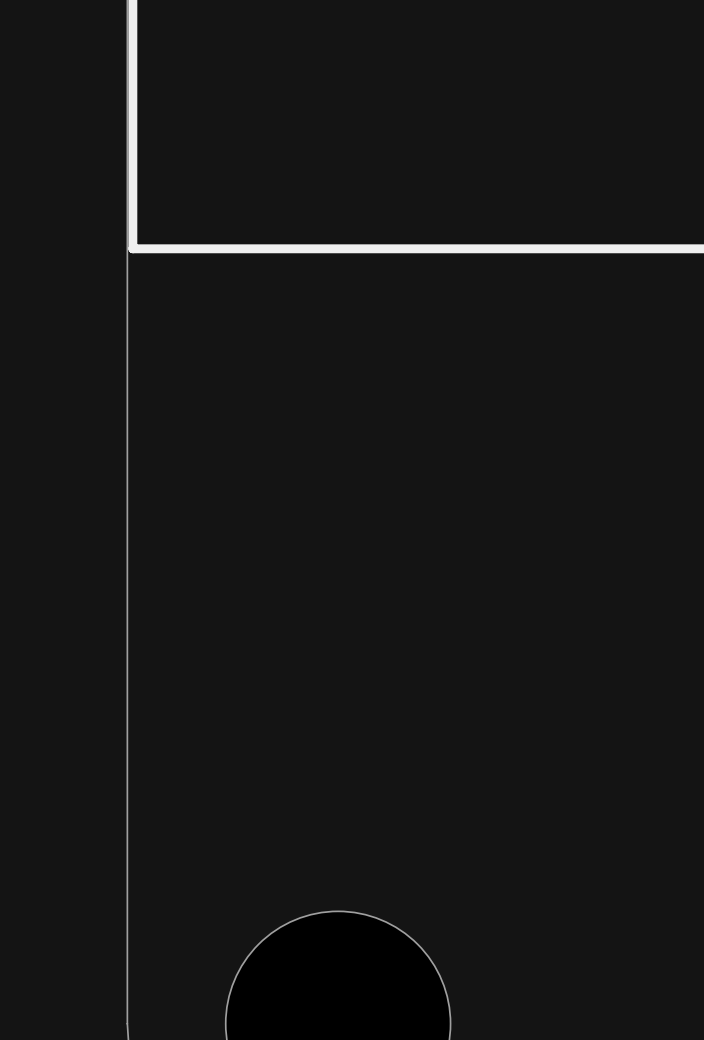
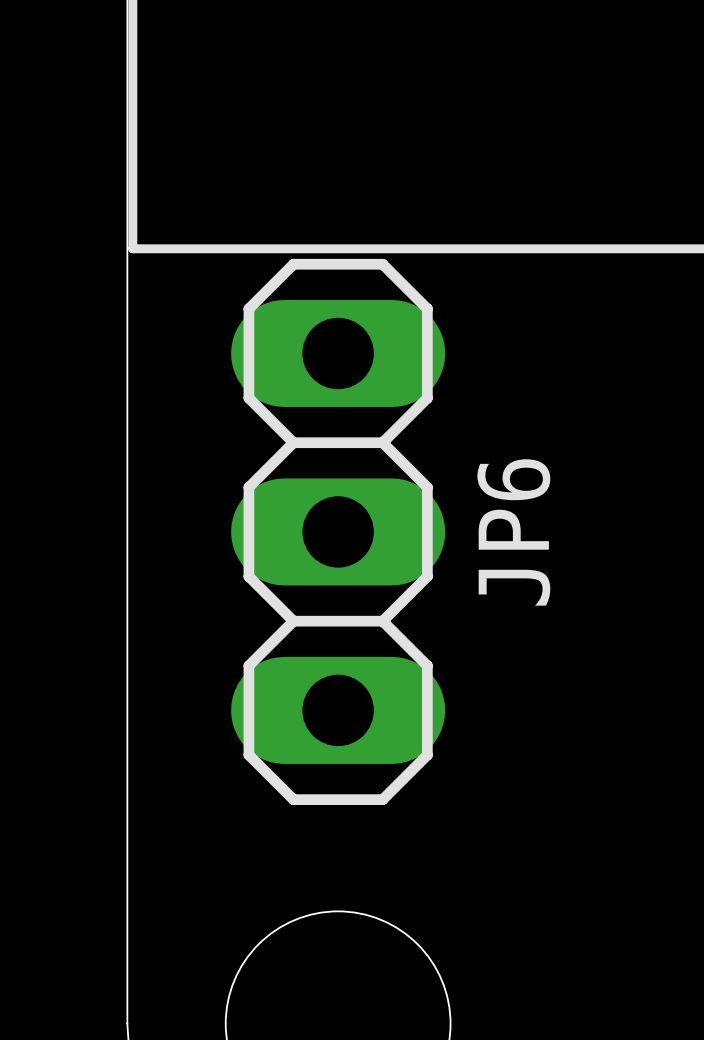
JP6: none -> (338, 531)

